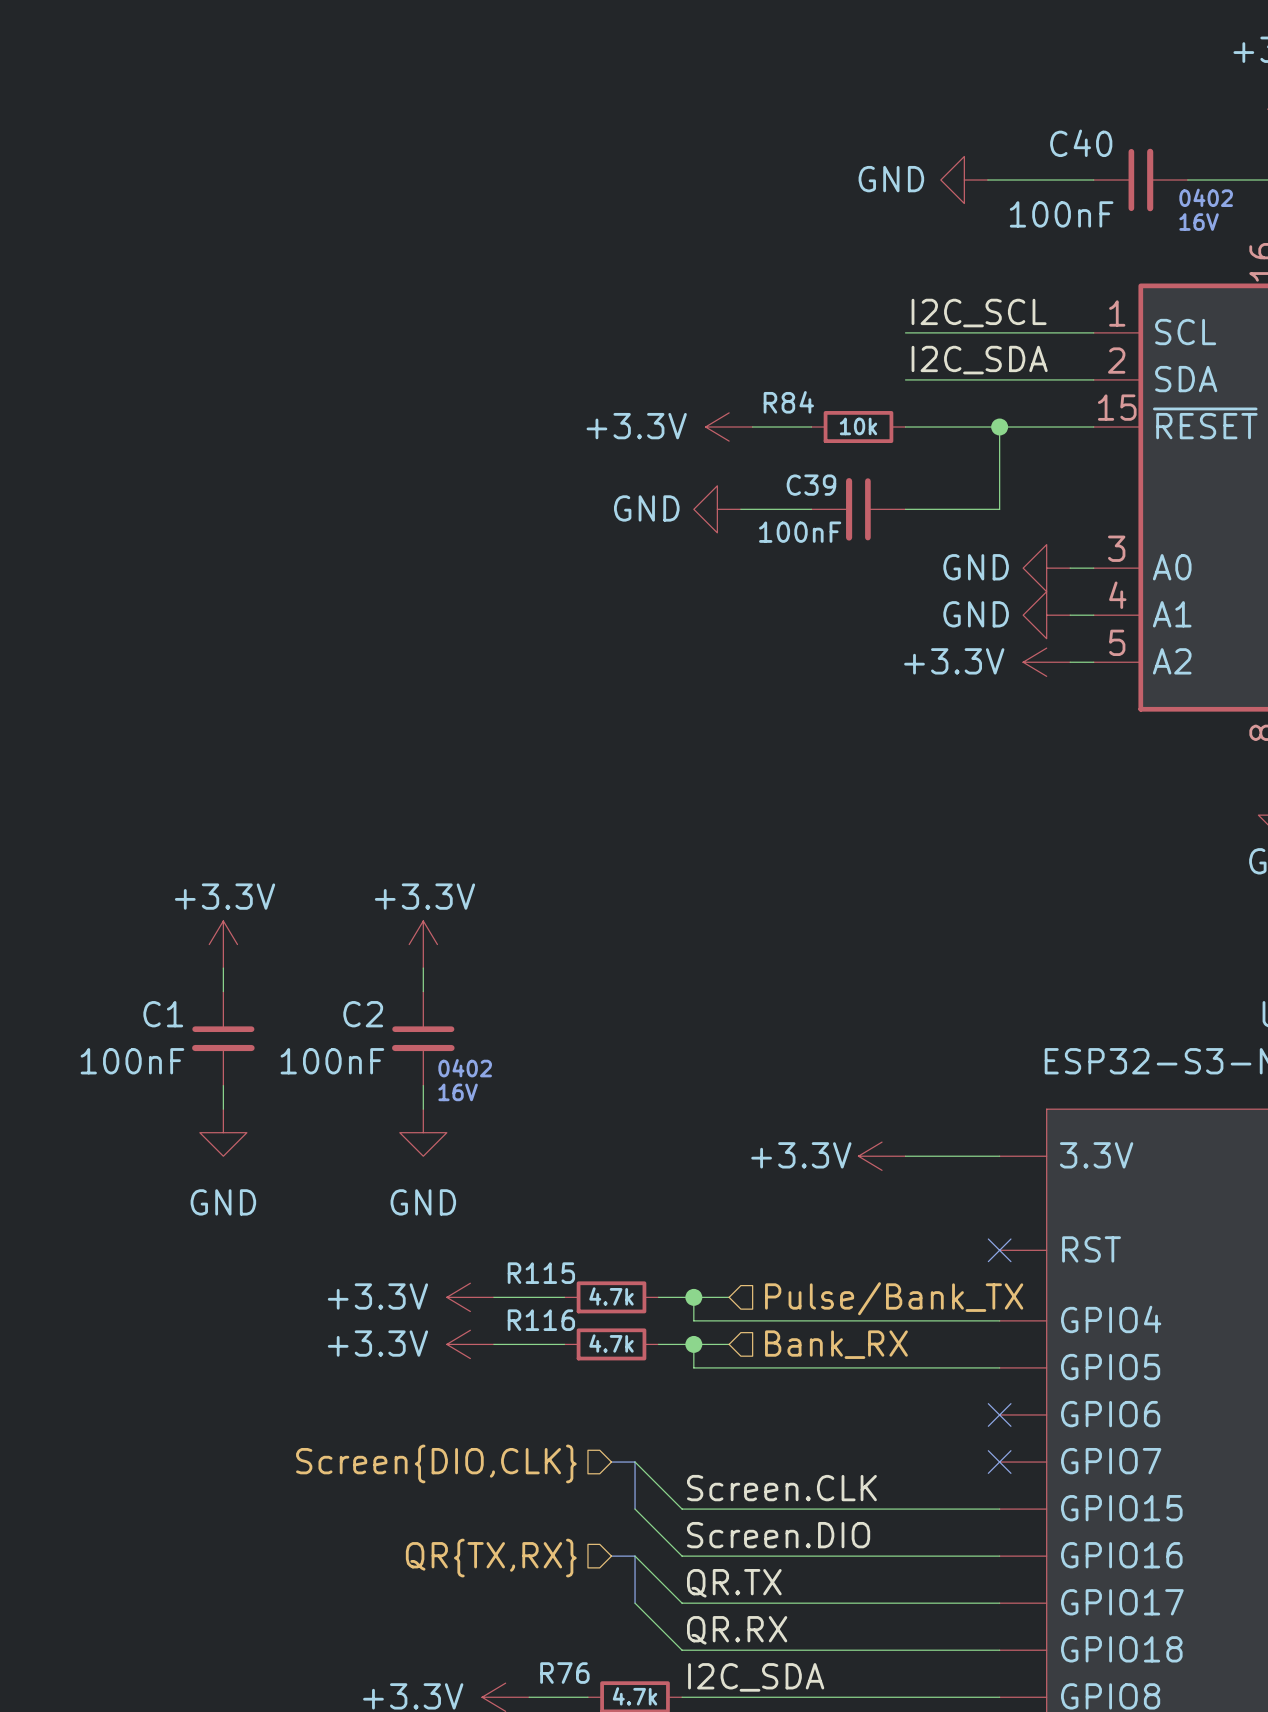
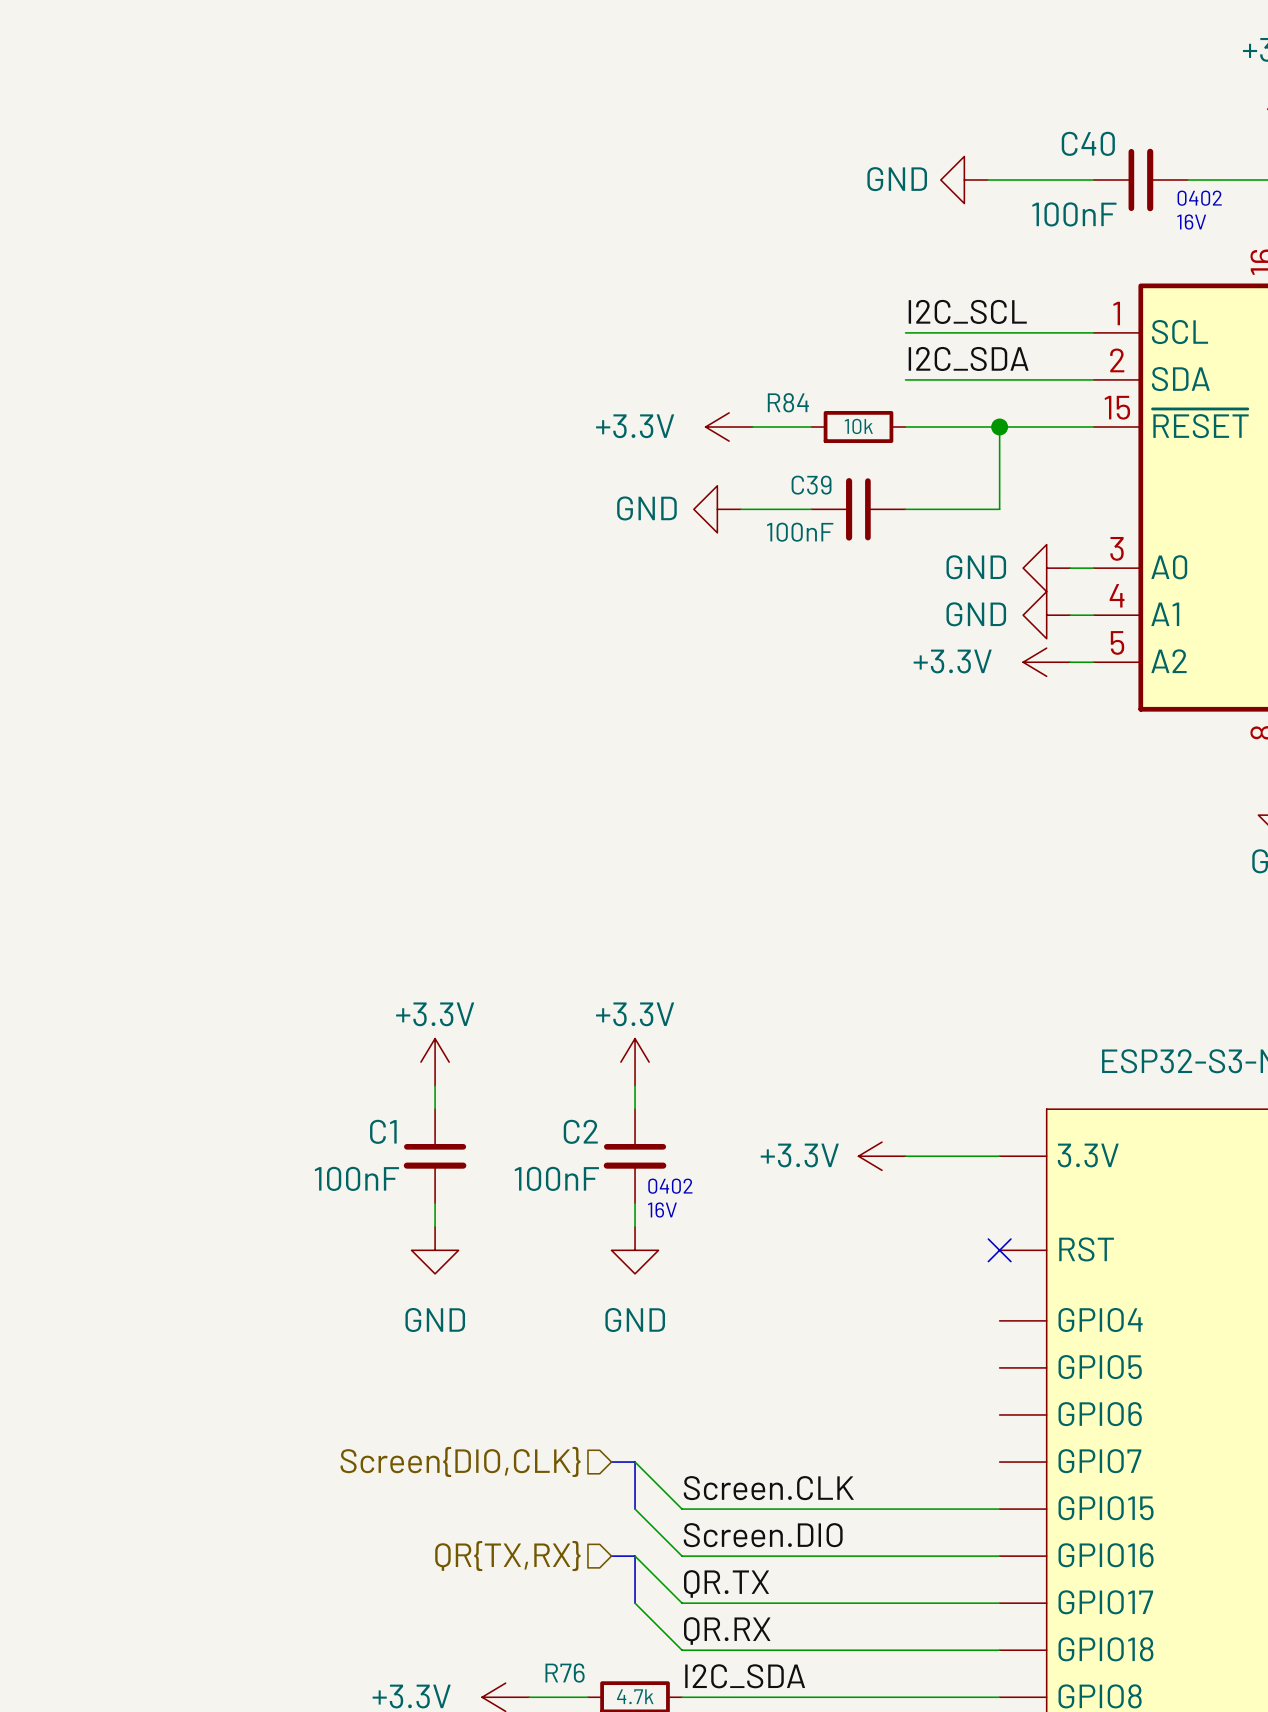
power symbol: +3.3V (223, 944) -> none
power symbol position: +3.3V (423, 944) -> +3.3V (435, 1062)
wire: (223, 968) (223, 991) -> (435, 1085) (435, 1109)
wire: (423, 968) (423, 991) -> (635, 1085) (635, 1109)
C1 position: (223, 1038) -> (435, 1156)
C2 position: (423, 1038) -> (635, 1156)
power symbol: none -> +3.3V (635, 1062)
text position: 0402 (465, 1068) -> 0402 (670, 1186)
wire: (223, 1085) (223, 1109) -> (435, 1203) (435, 1226)
wire: (423, 1085) (423, 1109) -> (635, 1203) (635, 1226)
text position: 16V (458, 1092) -> 16V (662, 1210)
power symbol: GND (223, 1132) -> none
power symbol position: GND (423, 1132) -> GND (435, 1250)
power symbol: none -> GND (635, 1250)
power symbol: +3.3V (470, 1297) -> none
wire: (493, 1297) (564, 1297) -> none
R115: 4.7k (611, 1297) -> none
wire: (658, 1297) (729, 1297) -> none
wire: (693, 1297) (693, 1320) (999, 1320) -> none
junction: (693, 1297) -> none
hierarchical label: Pulse/Bank_TX (894, 1298) -> none
power symbol: +3.3V (470, 1344) -> none
wire: (493, 1344) (564, 1344) -> none
R116: 4.7k (611, 1344) -> none
wire: (658, 1344) (729, 1344) -> none
wire: (693, 1344) (693, 1367) (999, 1367) -> none
junction: (693, 1344) -> none
hierarchical label: Bank_RX (836, 1344) -> none
no-connect mark: (999, 1414) -> none
no-connect mark: (999, 1462) -> none

